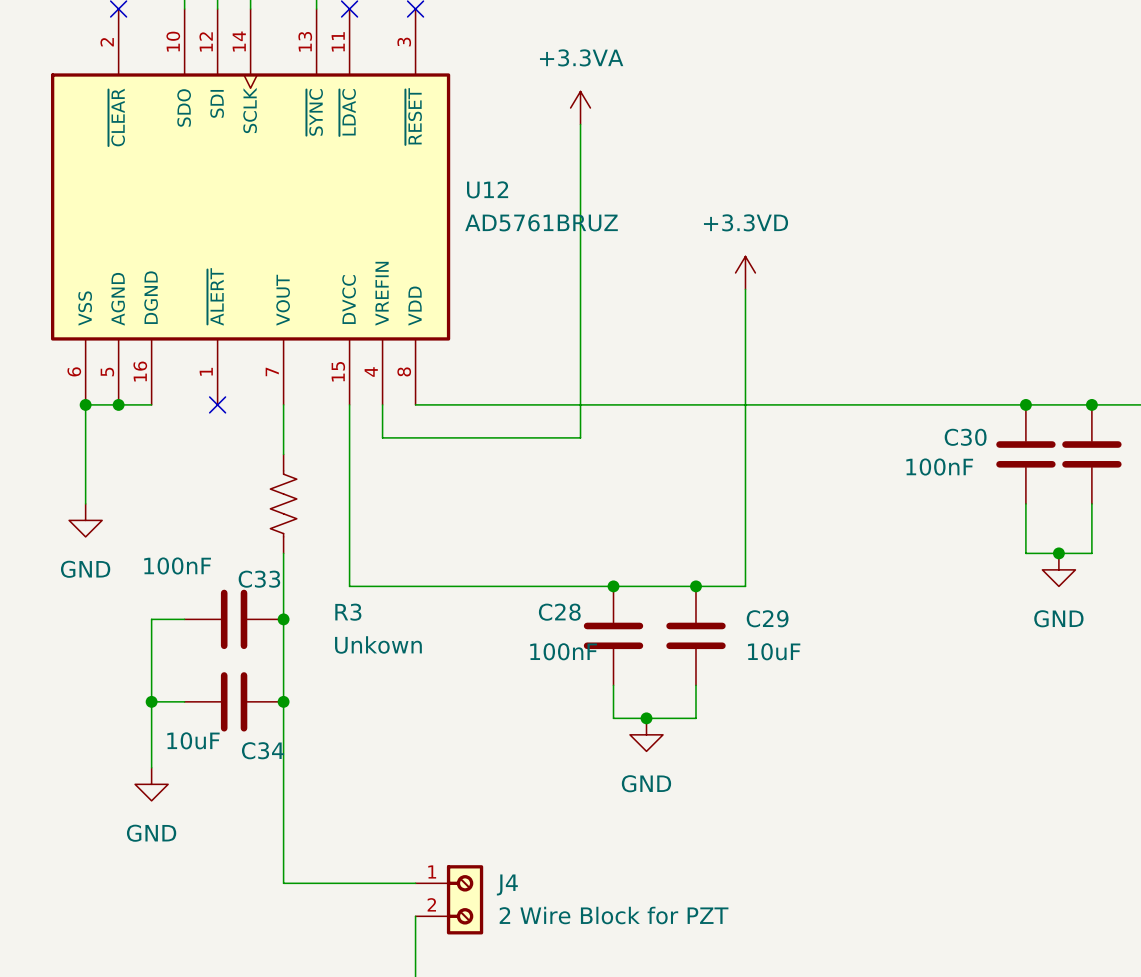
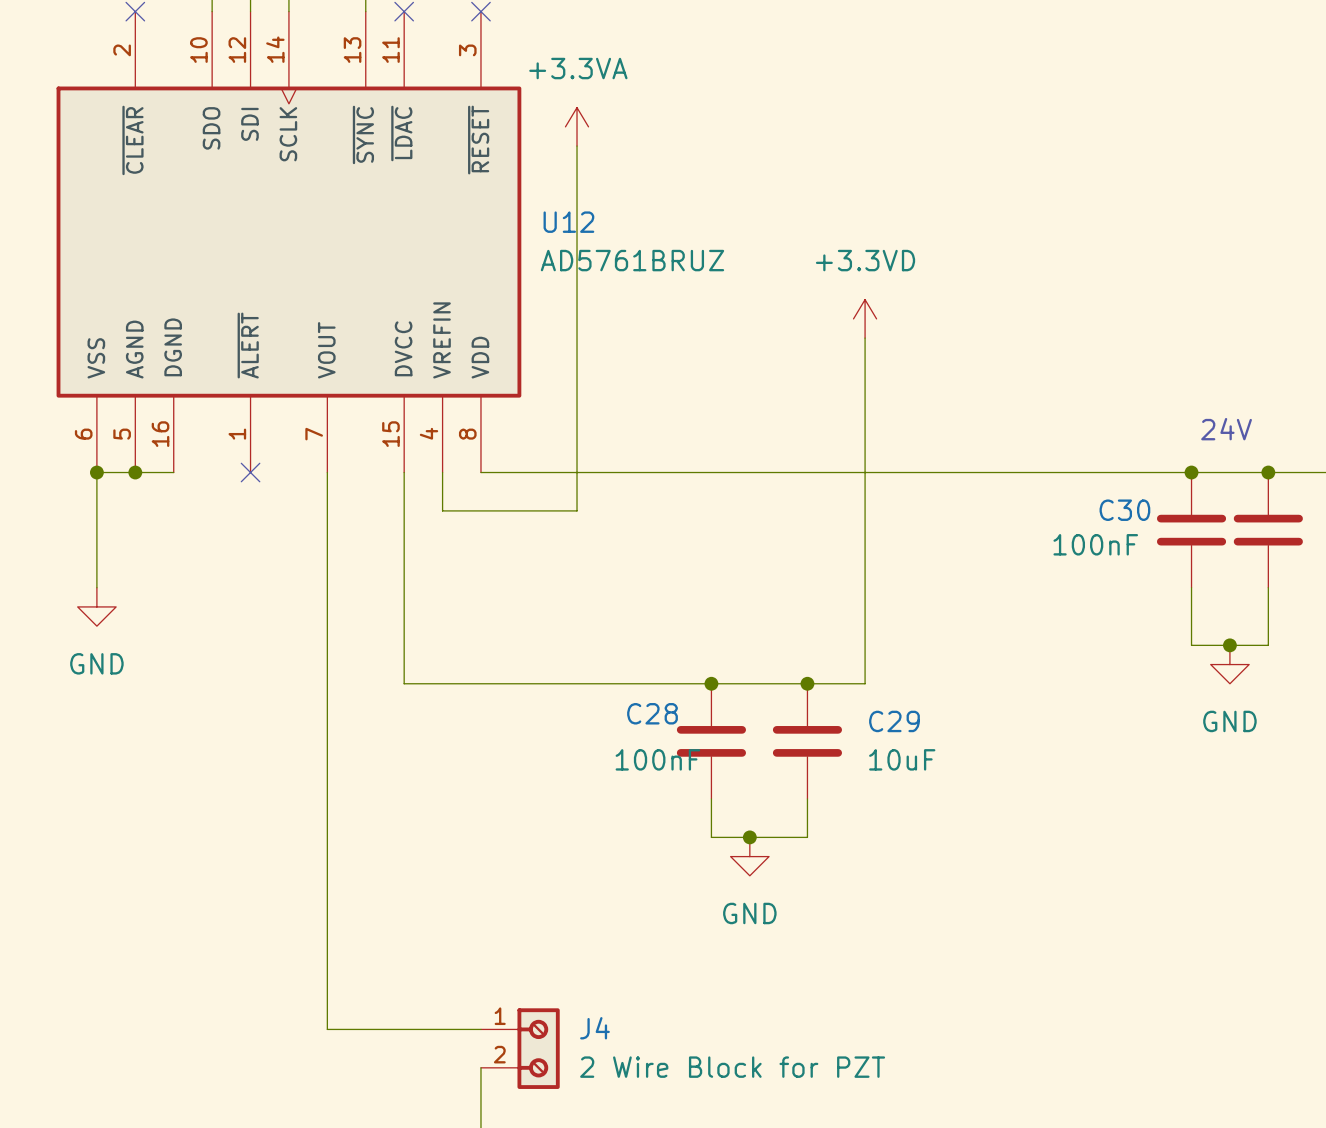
power symbol position: +3.3VA (580, 107) -> +3.3VA (577, 126)
wire: (580, 124) (580, 437) (498, 437) -> (577, 146) (577, 510)
text: none -> 24V (1226, 429)
wire: none -> (327, 530) (327, 645)
R3: Unkown (283, 503) -> none
wire: (184, 619) (151, 619) (151, 767) -> none
C33: 100nF (234, 619) -> none
junction: (283, 619) -> none
wire: (151, 701) (184, 701) -> none
junction: (151, 701) -> none
C34: 10uF (234, 701) -> none
junction: (283, 701) -> none
power symbol: GND (151, 784) -> none

